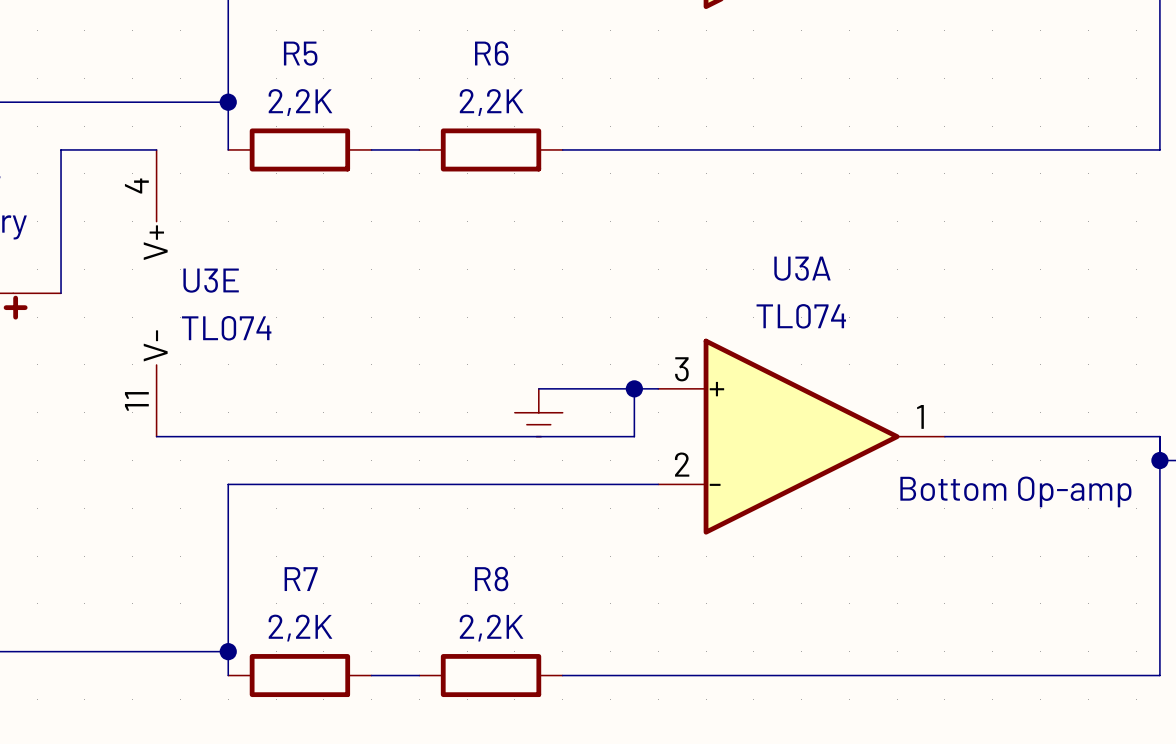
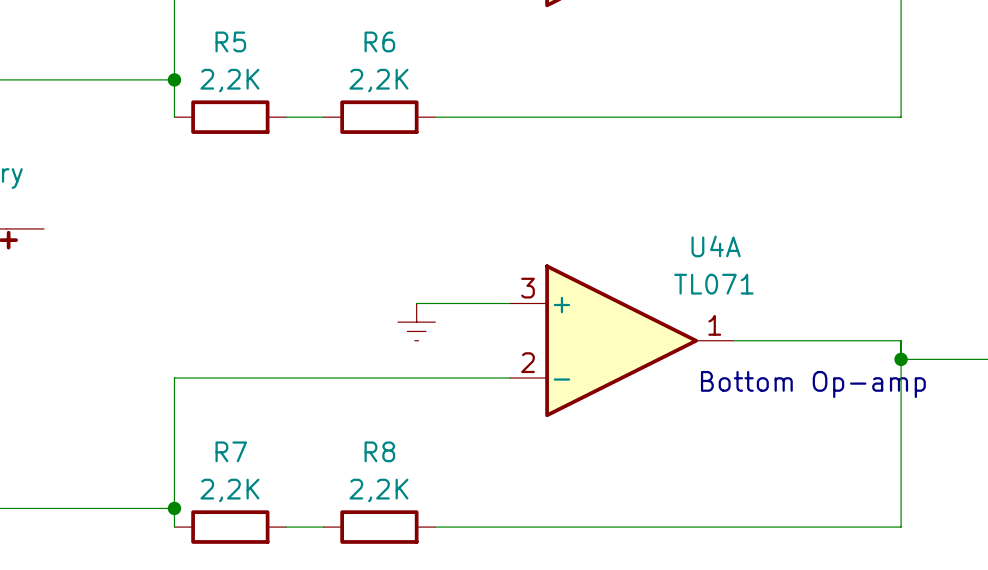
wire: (156, 149) (61, 149) (61, 293) -> none
U3A name: U3A (802, 268) -> U4A (716, 246)
U3E: TL074 (156, 293) -> none
U3A value: TL074 (801, 316) -> TL071 (713, 284)
wire: (634, 388) (634, 436) (156, 436) -> none
junction: (634, 388) -> none

